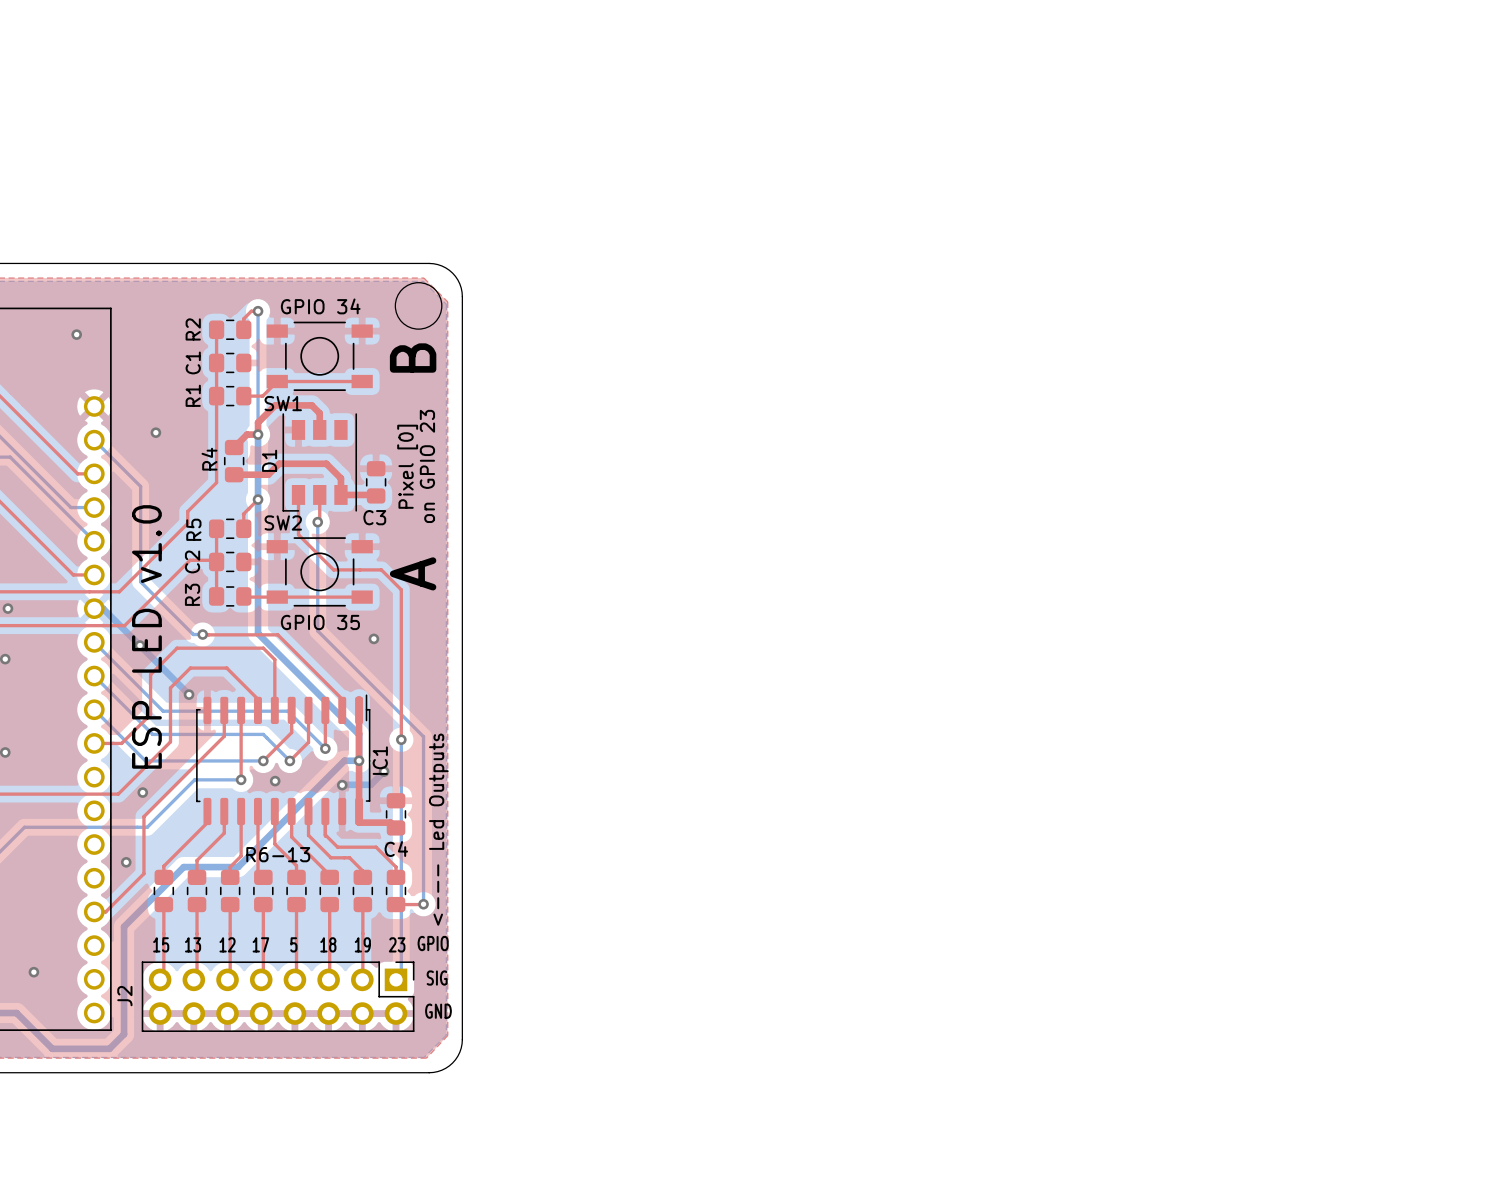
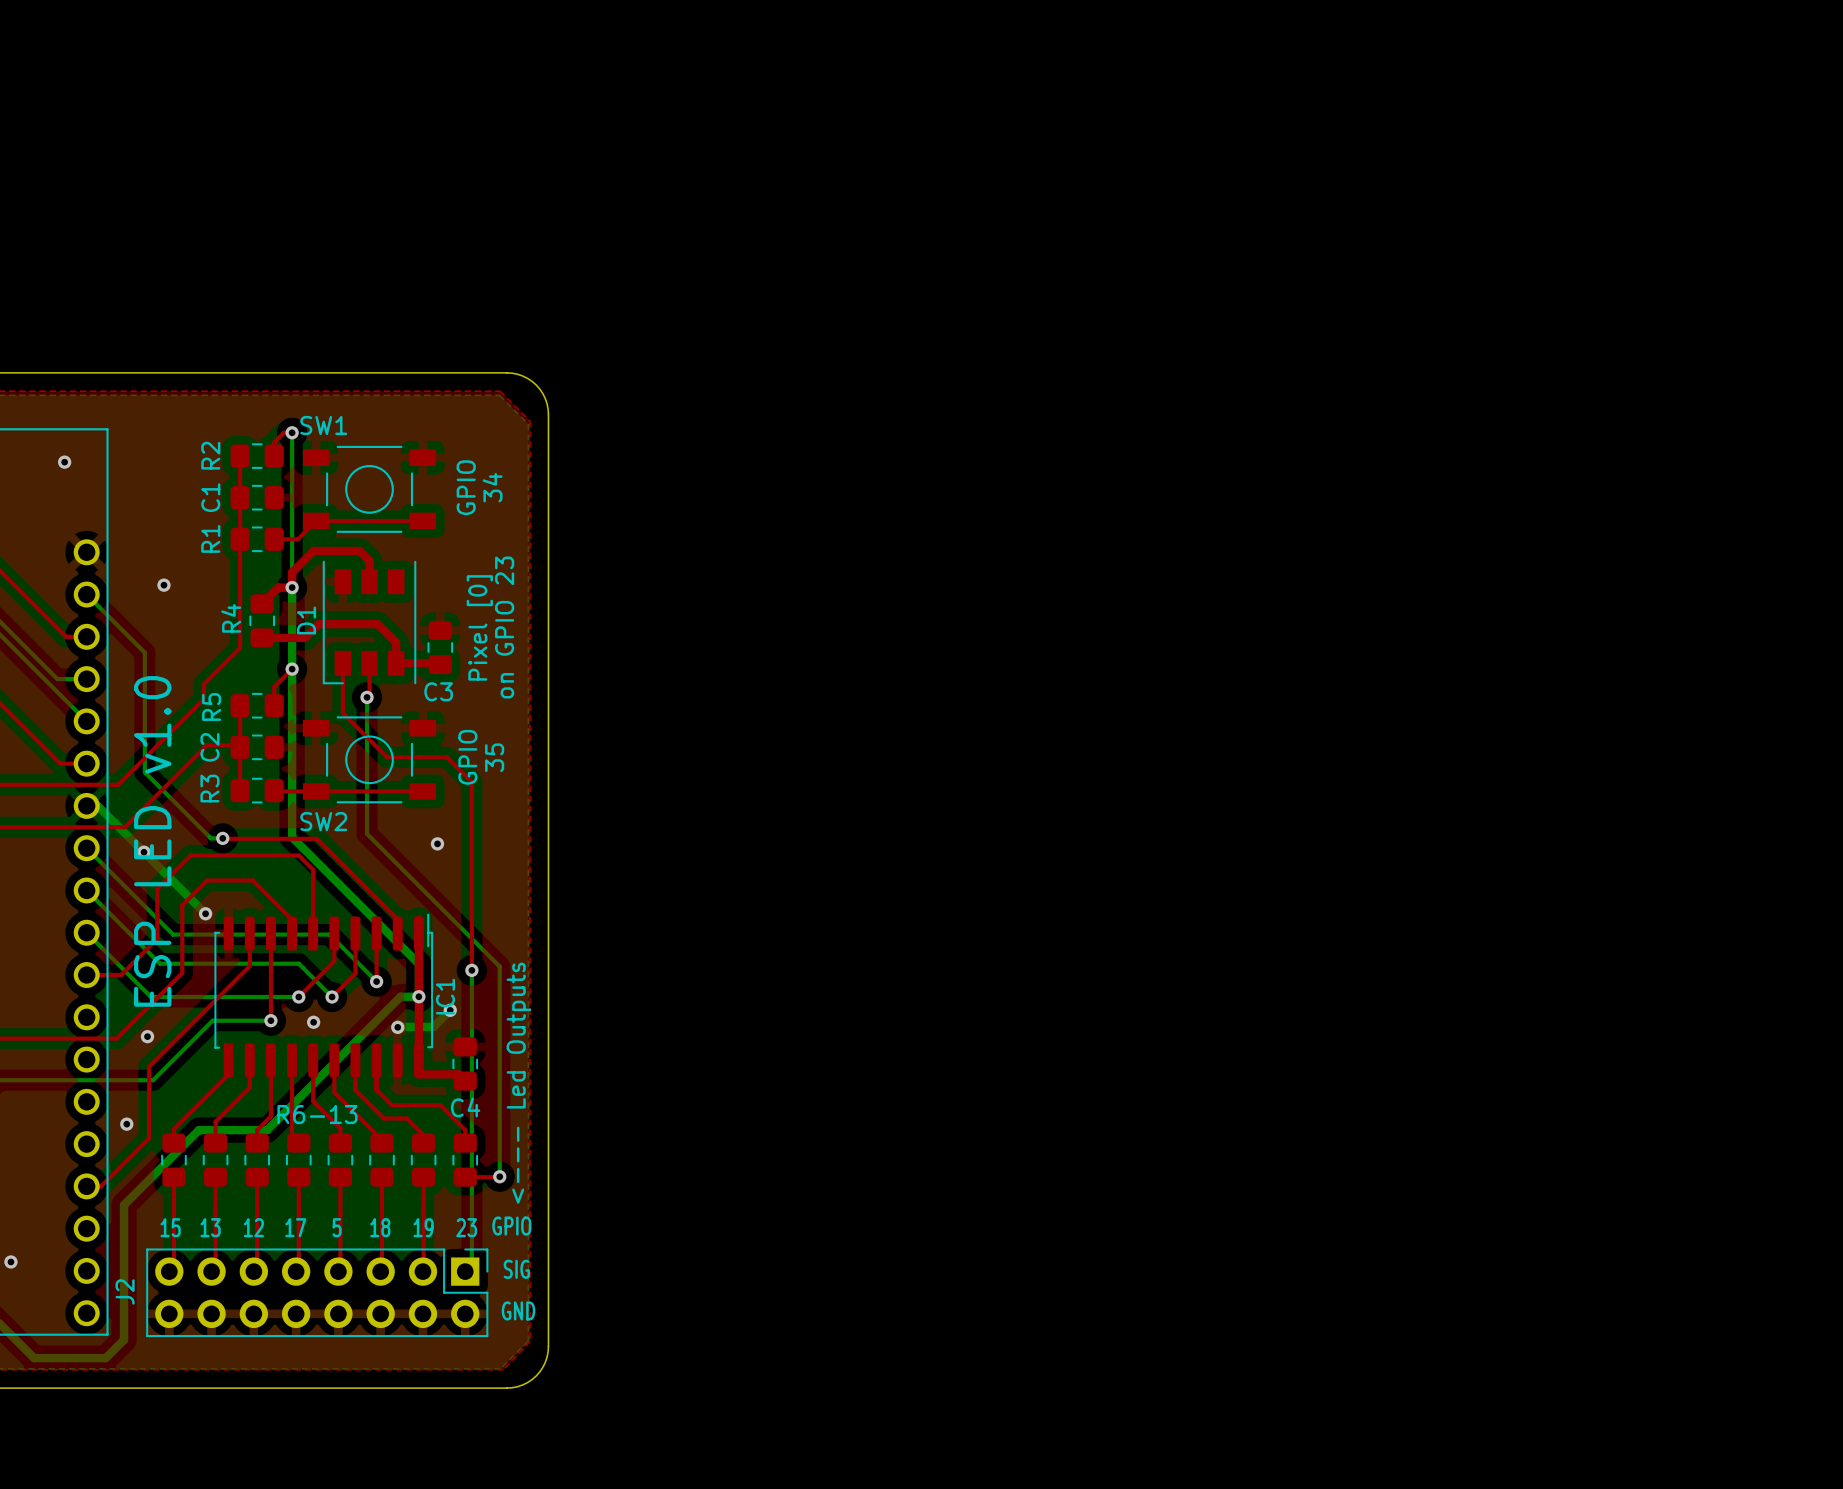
round board edge: [395, 282, 443, 330] -> none
text: GPIO 34 (320, 306) -> none
text: none -> GPIO (466, 487)
text: B (413, 358) -> 34 (492, 487)
SW1 name position: SW1 (283, 403) -> SW1 (323, 425)
SW2 name position: SW2 (283, 522) -> SW2 (323, 821)
text: none -> GPIO (467, 757)
text: A (413, 573) -> 35 (494, 757)
text: GPIO 35 (320, 622) -> none

